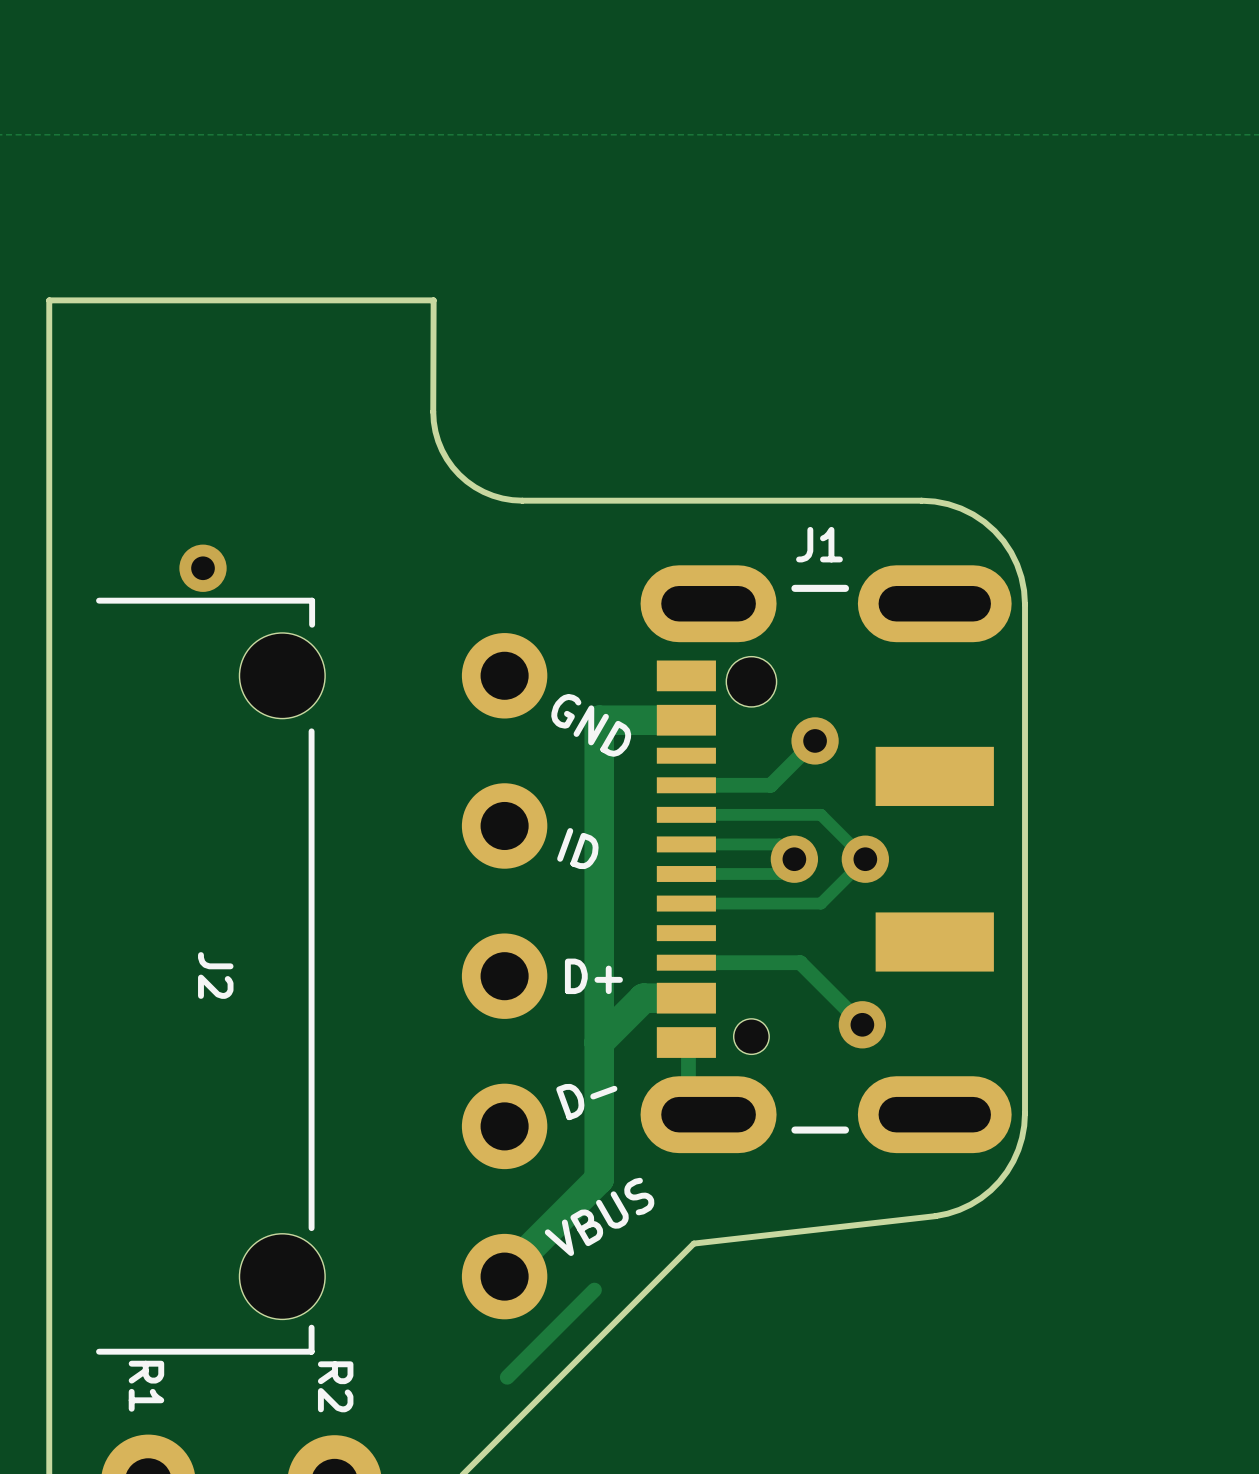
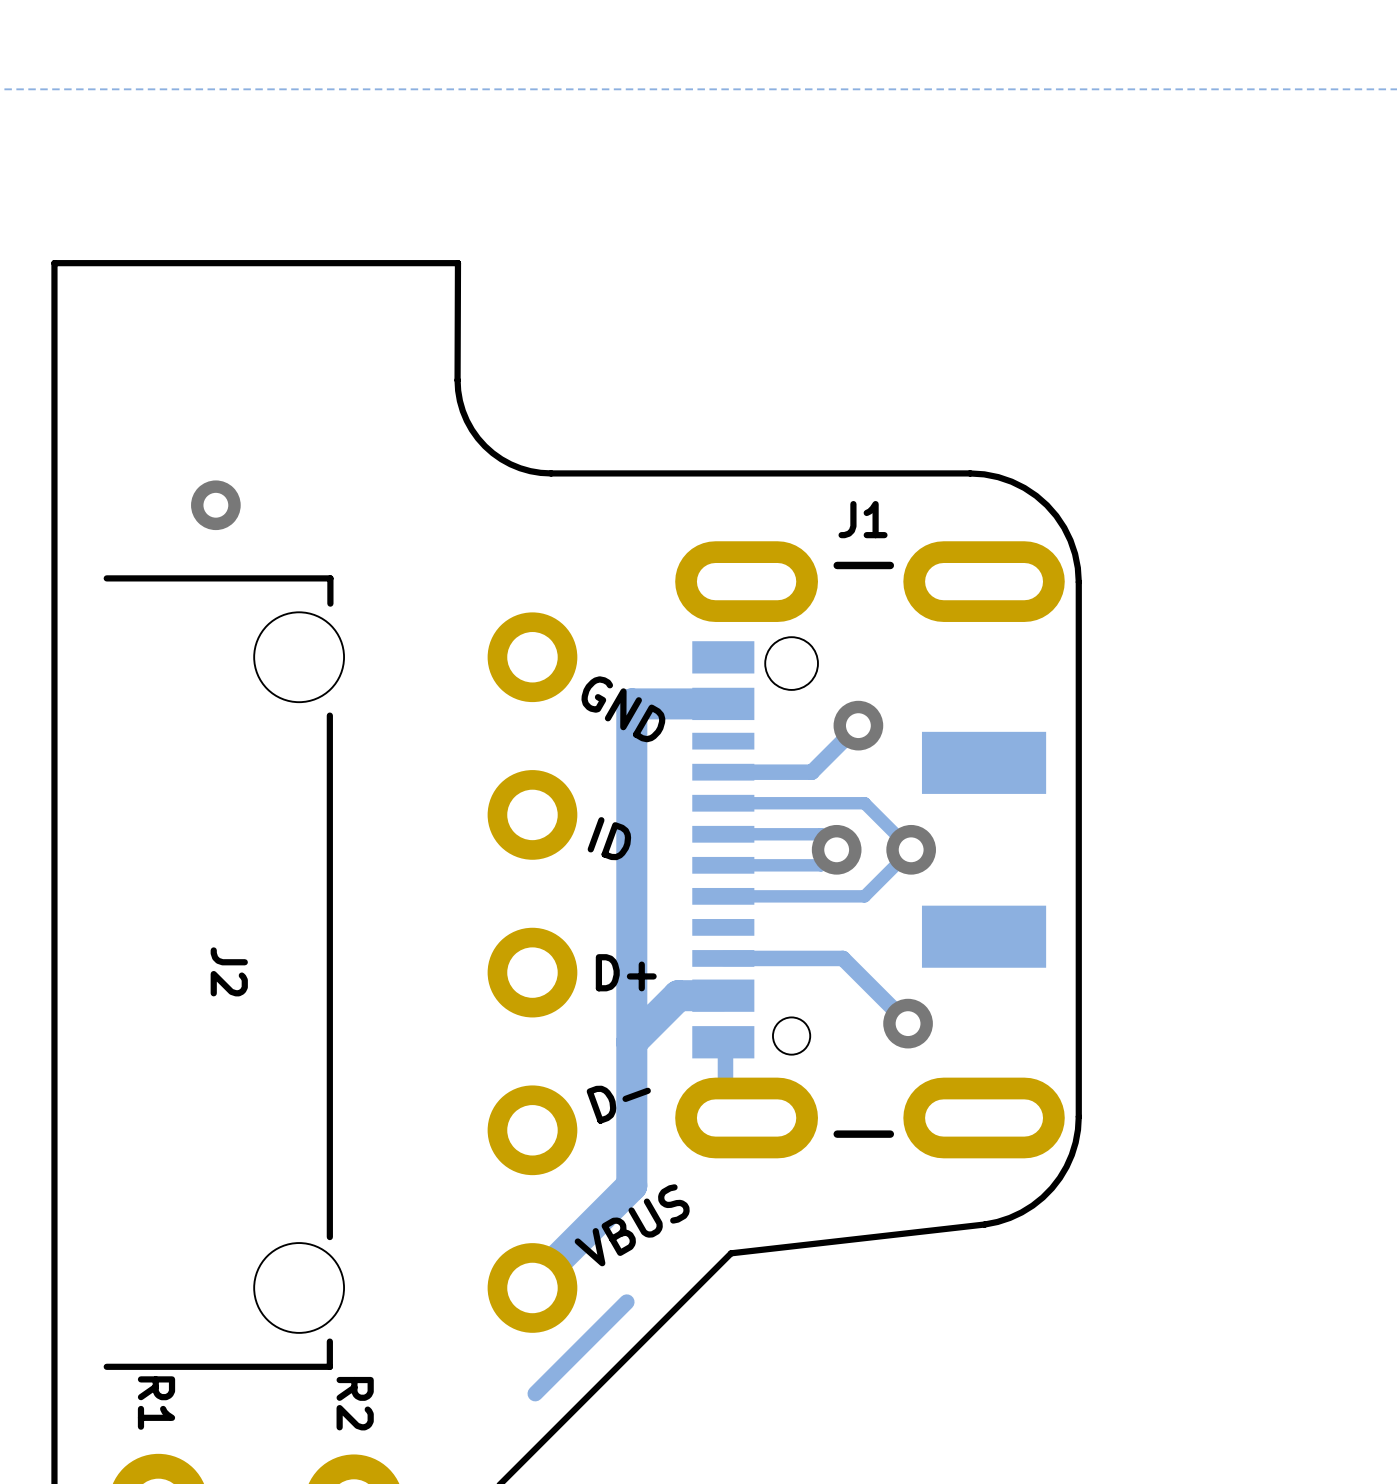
via position: (203, 568) -> (215, 505)

